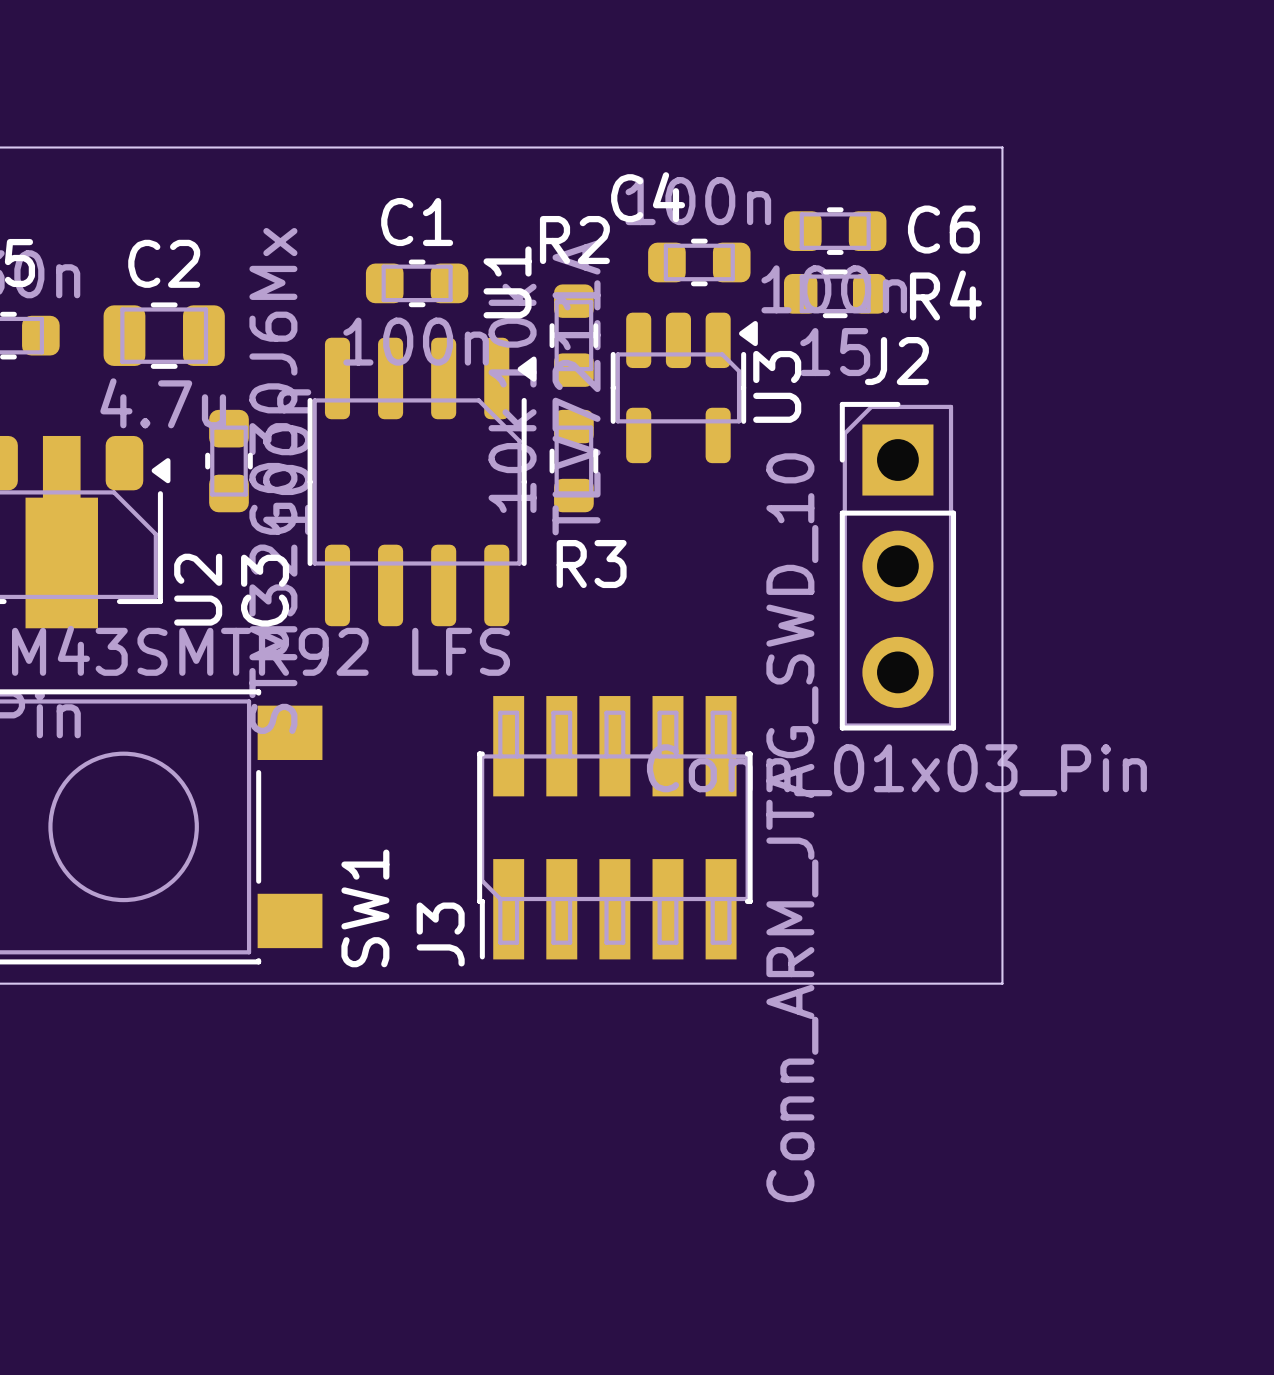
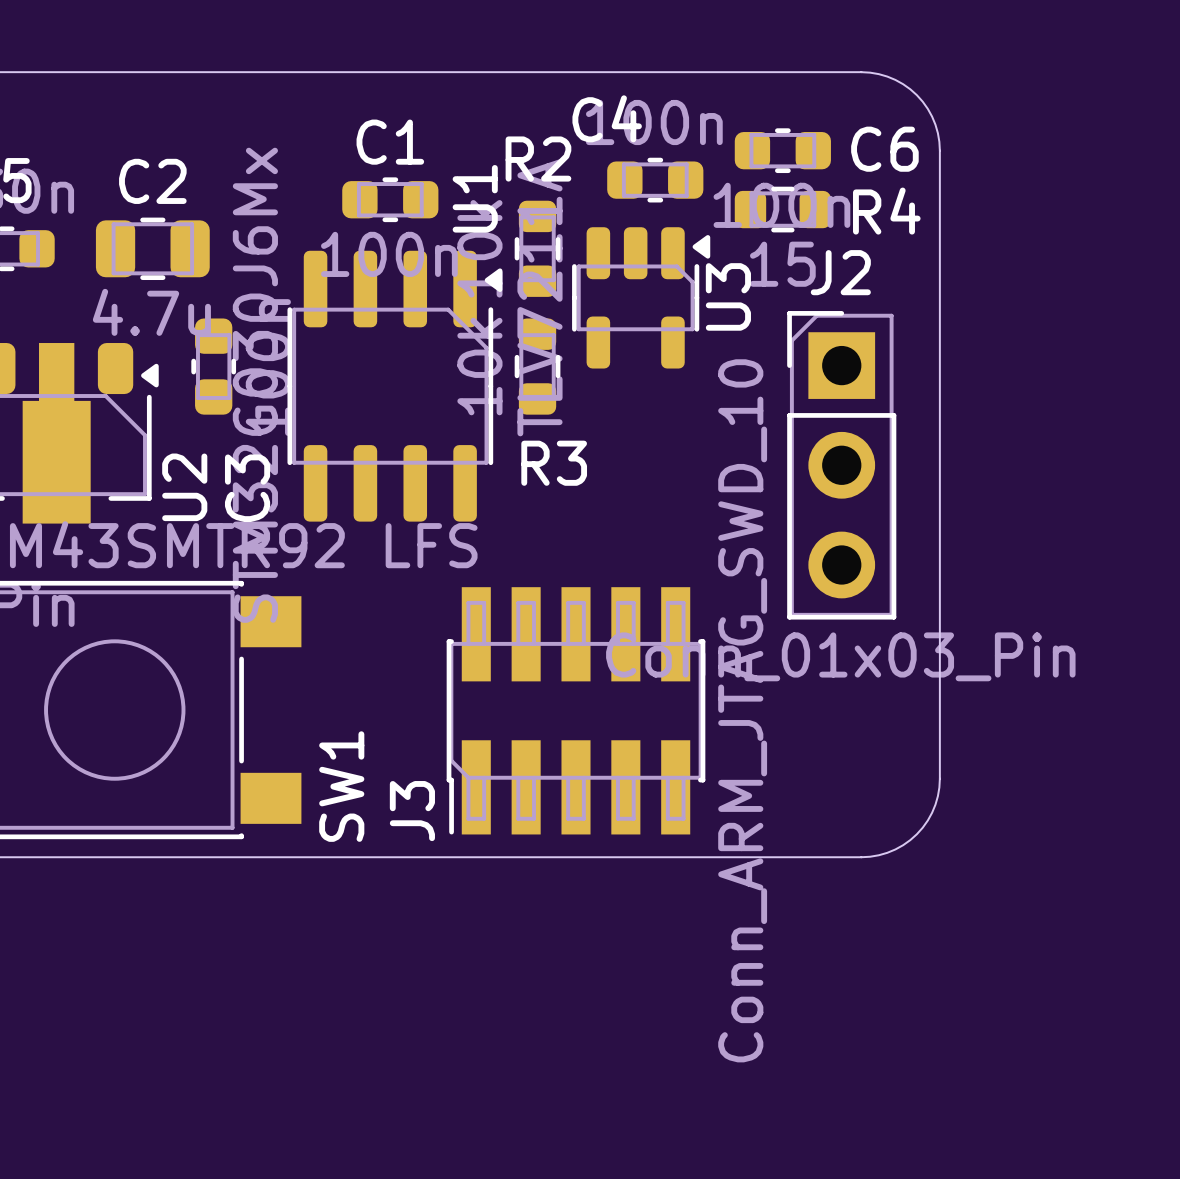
board edge: (918, 147) (1002, 147) (1002, 231) -> (861, 72) (878, 74) (895, 79) (916, 95) (927, 108) (935, 124) (939, 150)
board edge: (1002, 900) (1002, 983) (918, 983) -> (939, 778) (937, 796) (932, 812) (916, 834) (895, 849) (878, 855) (861, 857)

